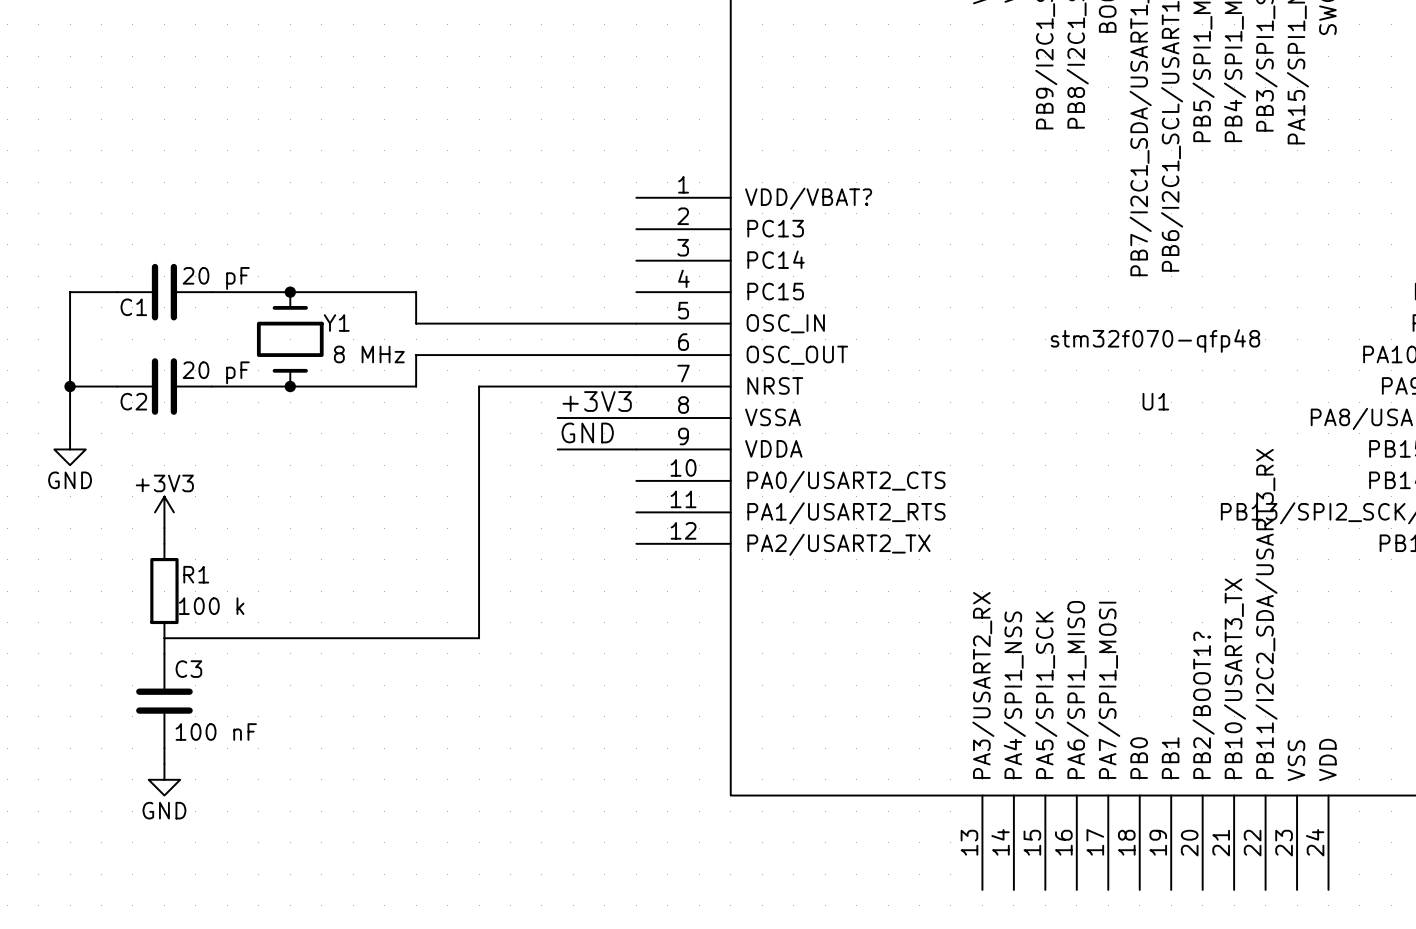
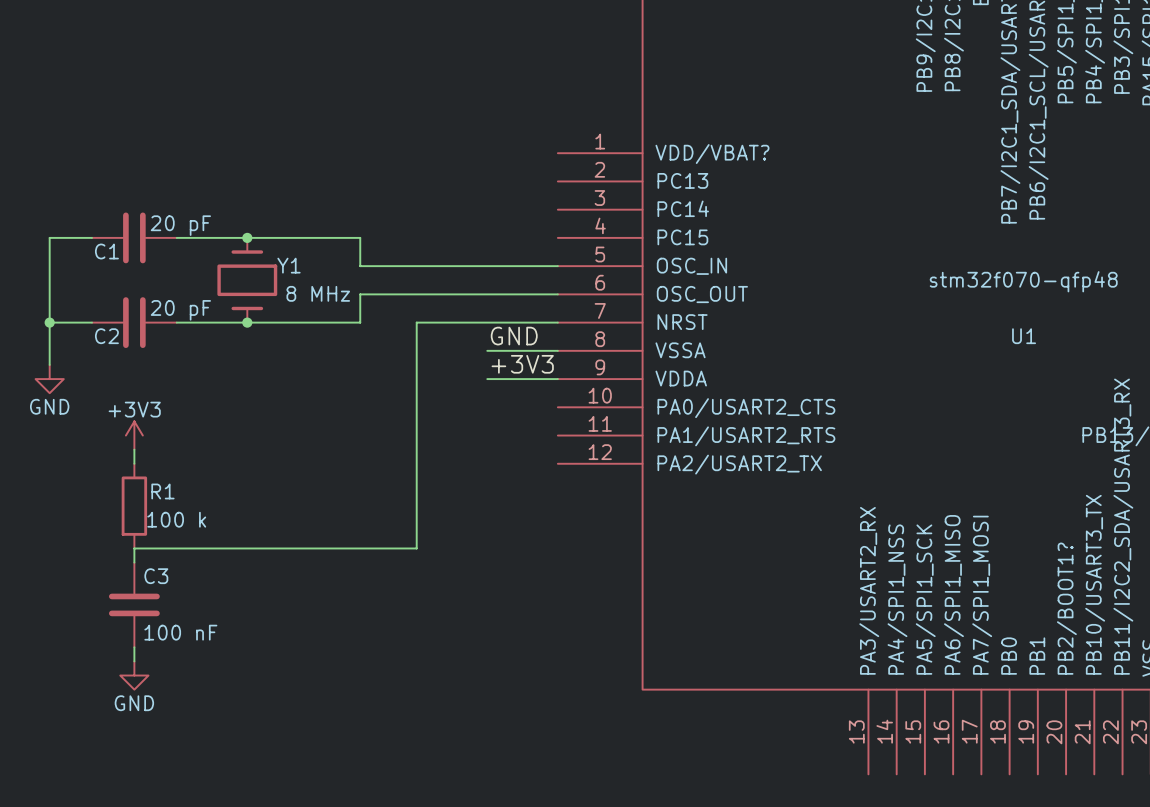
label: +3V3 (597, 401) -> GND (514, 336)
label: GND (587, 432) -> +3V3 (522, 364)

